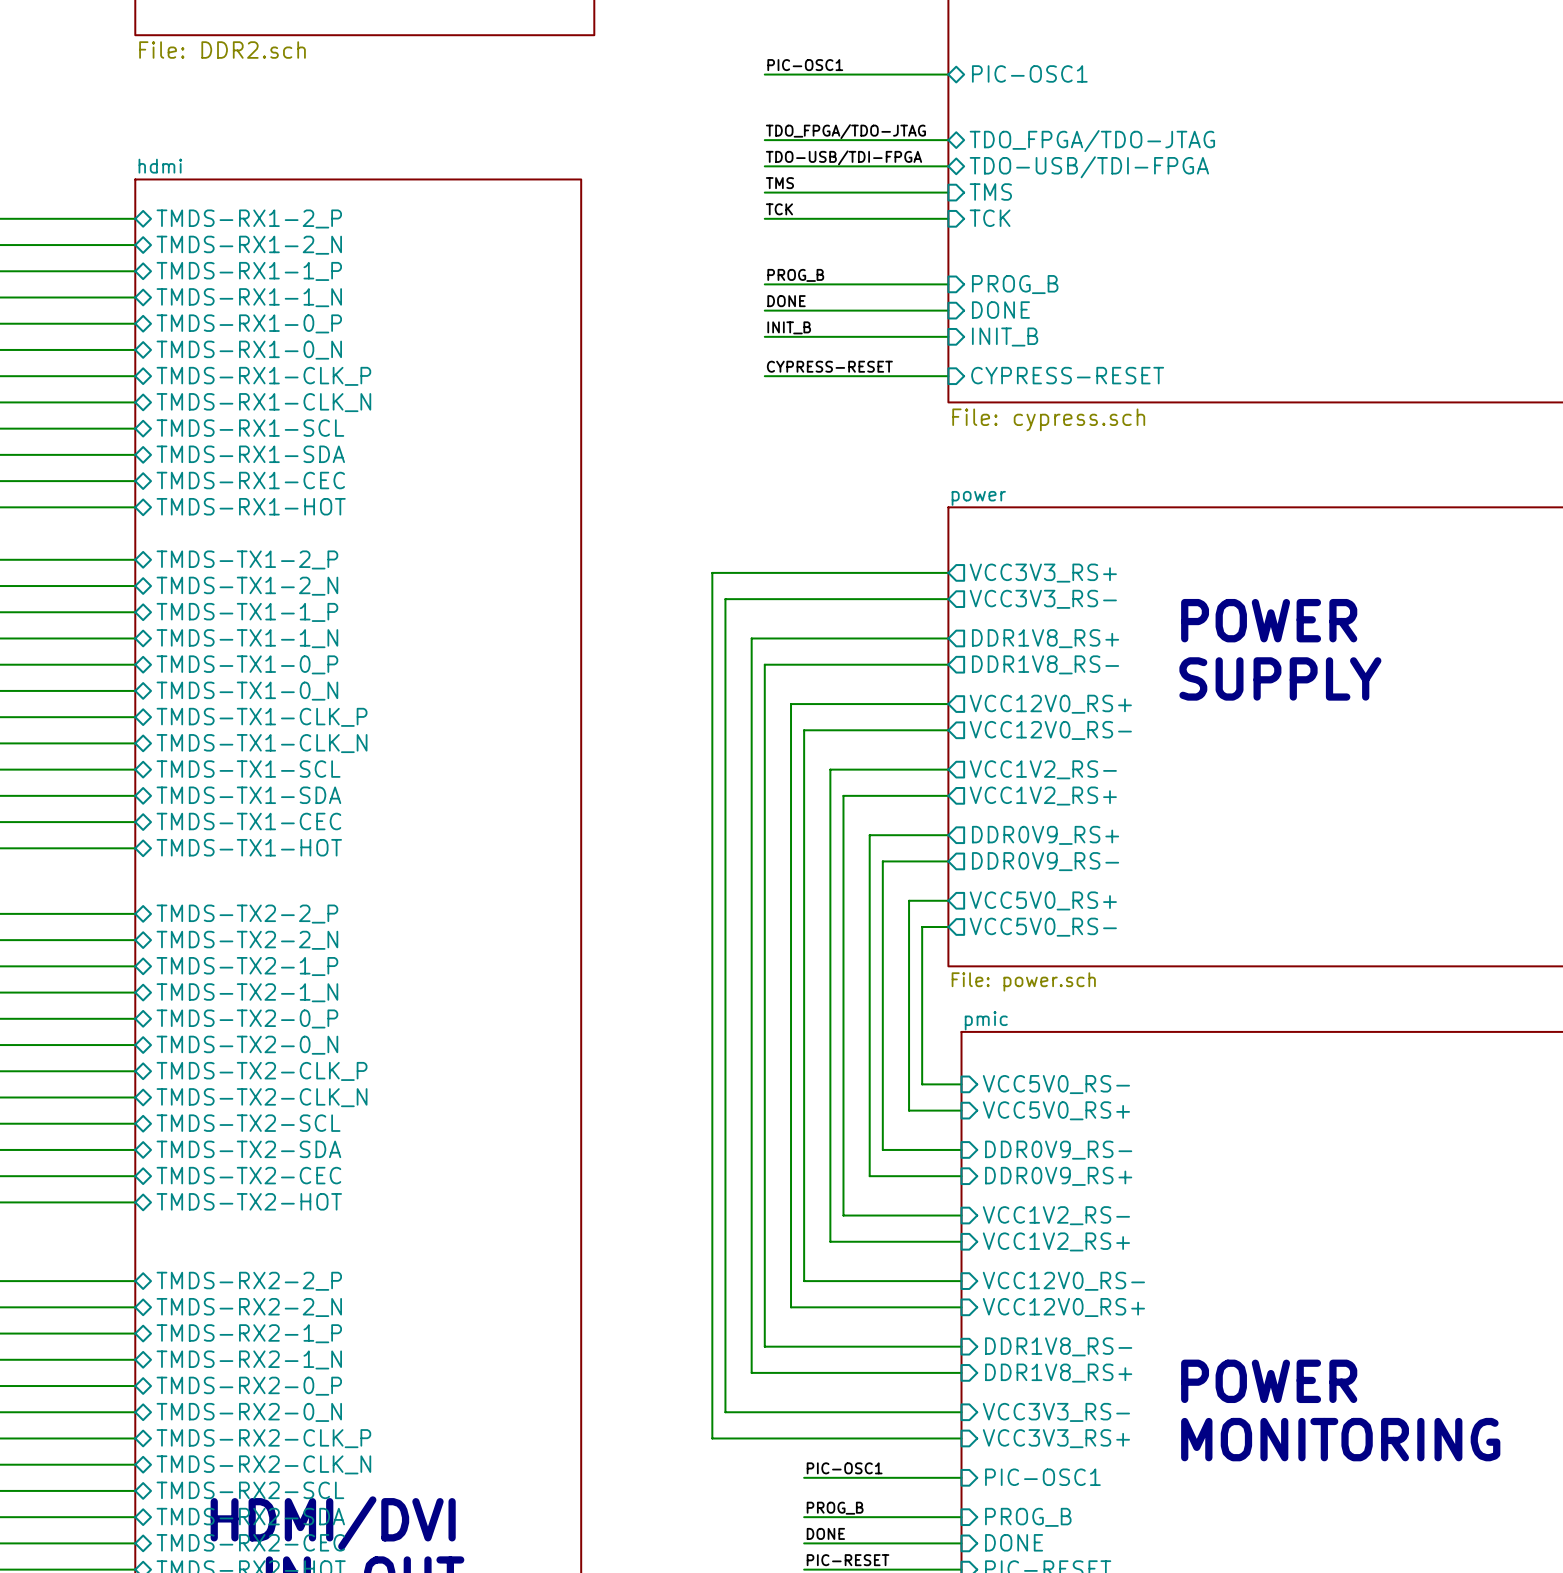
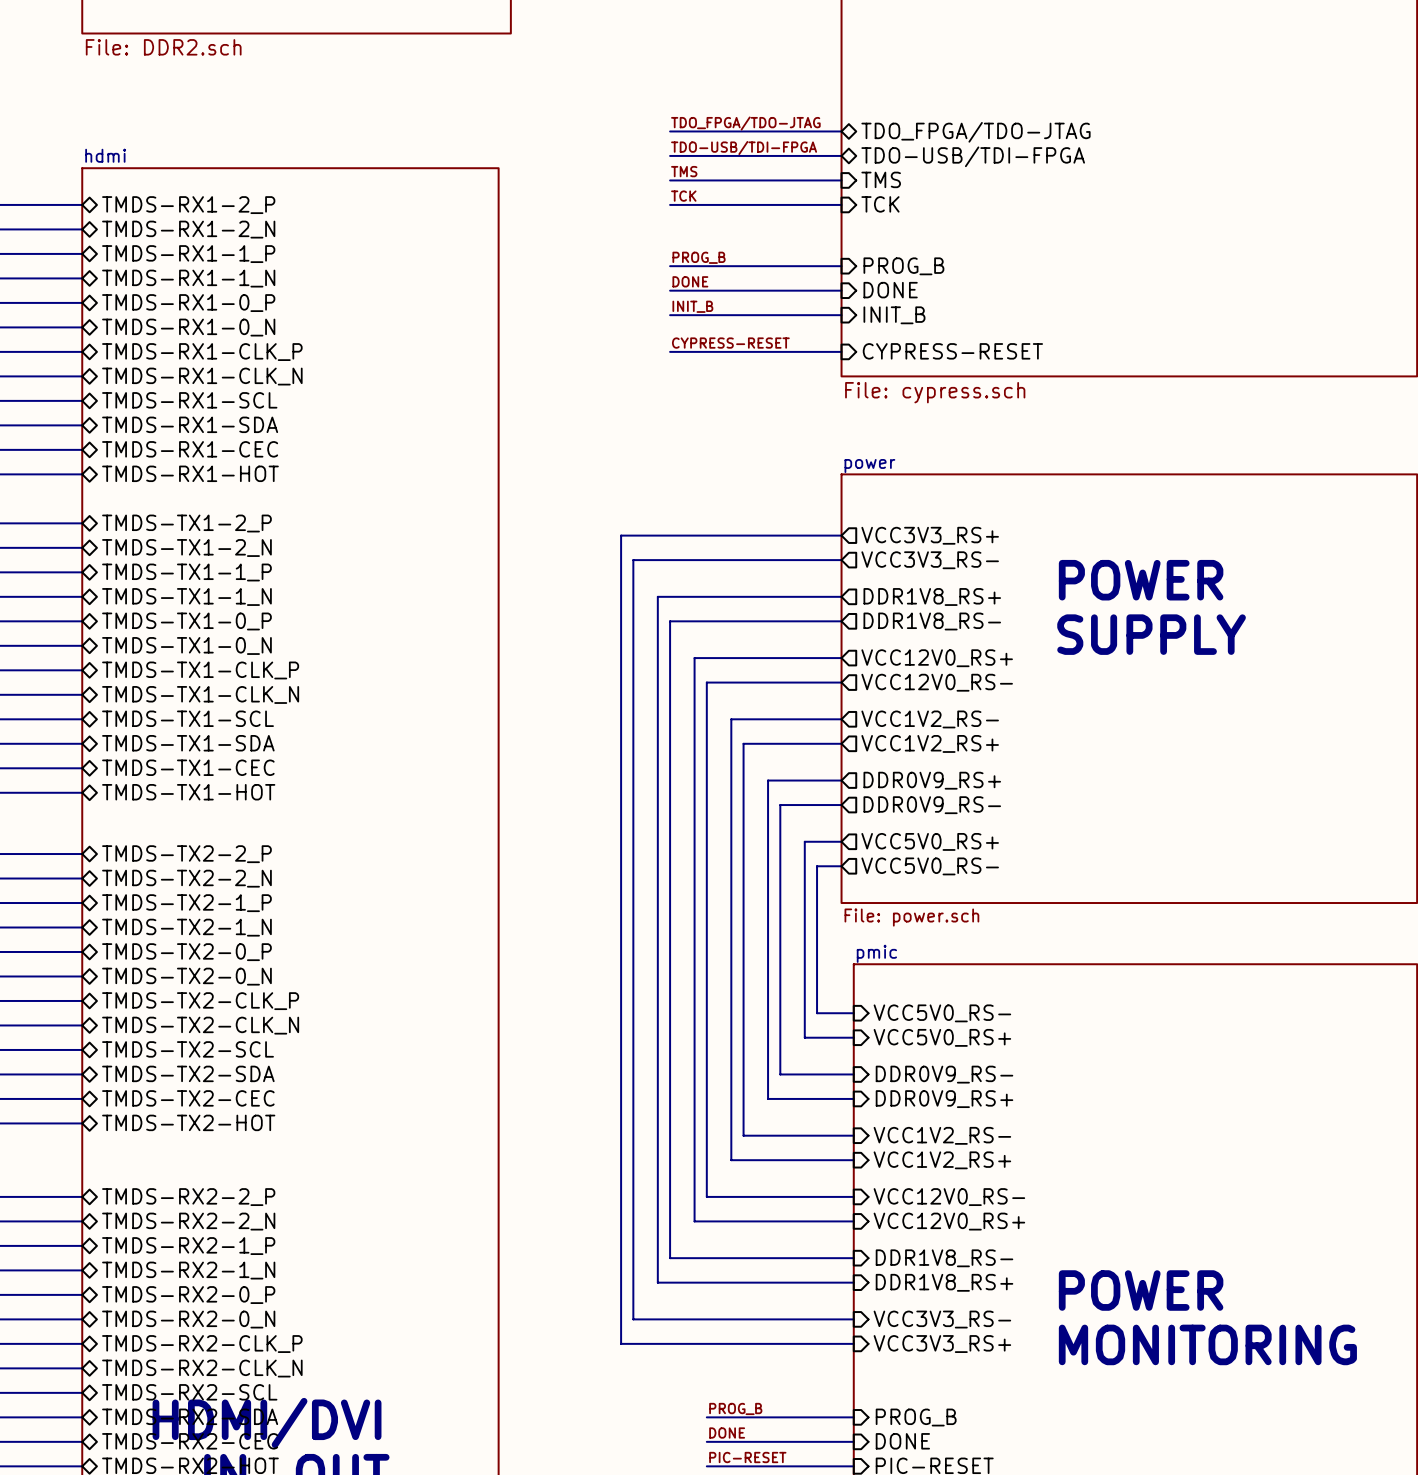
label: PIC-OSC1 (805, 65) -> none
sheet pin: PIC-OSC1 (1029, 73) -> none
wire: (764, 74) (948, 74) -> none
label: PIC-OSC1 (844, 1468) -> none
wire: (804, 1477) (961, 1477) -> none
sheet pin: PIC-OSC1 (1042, 1477) -> none

